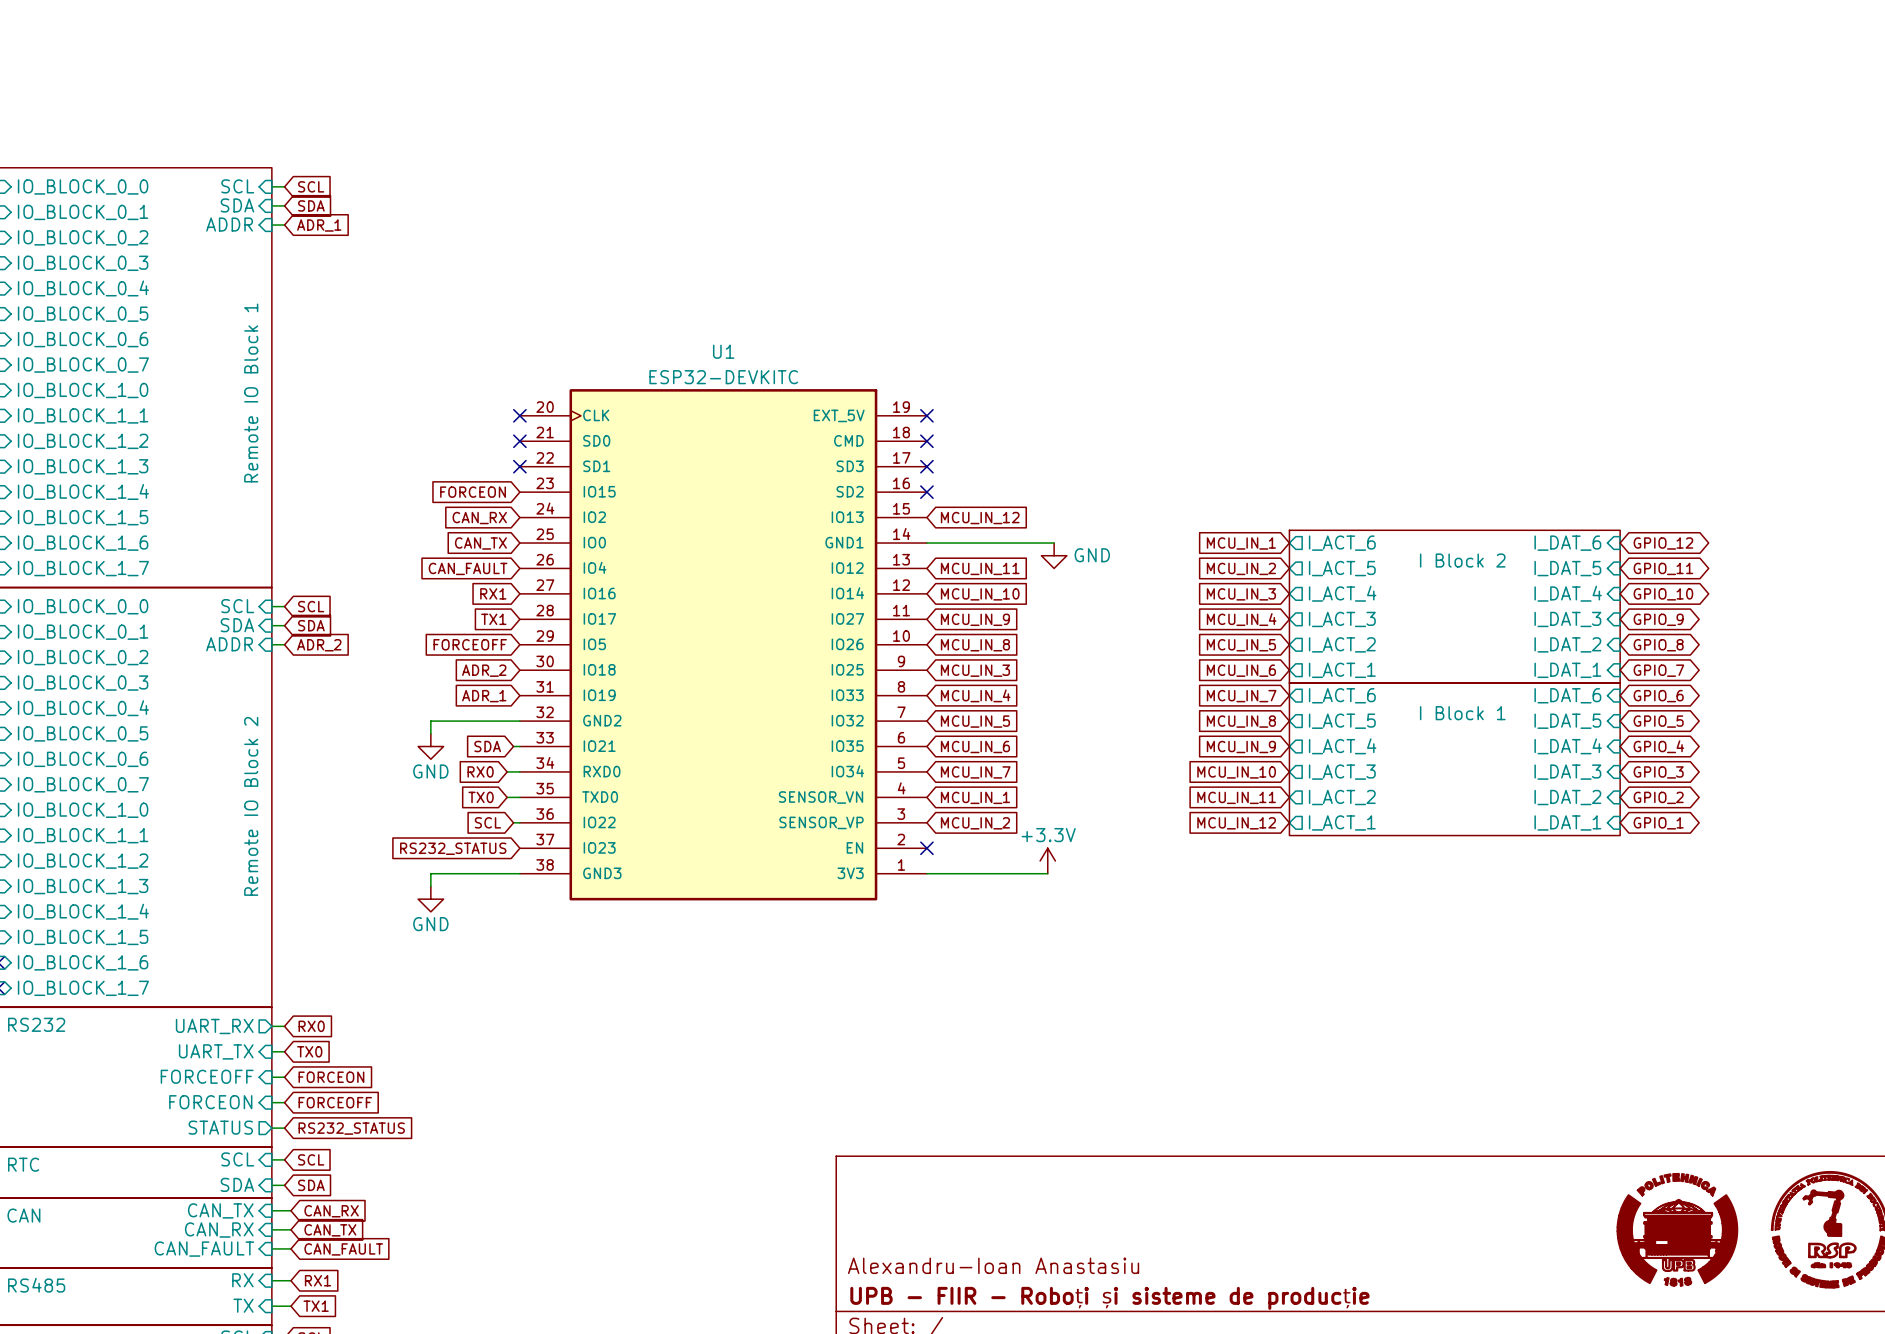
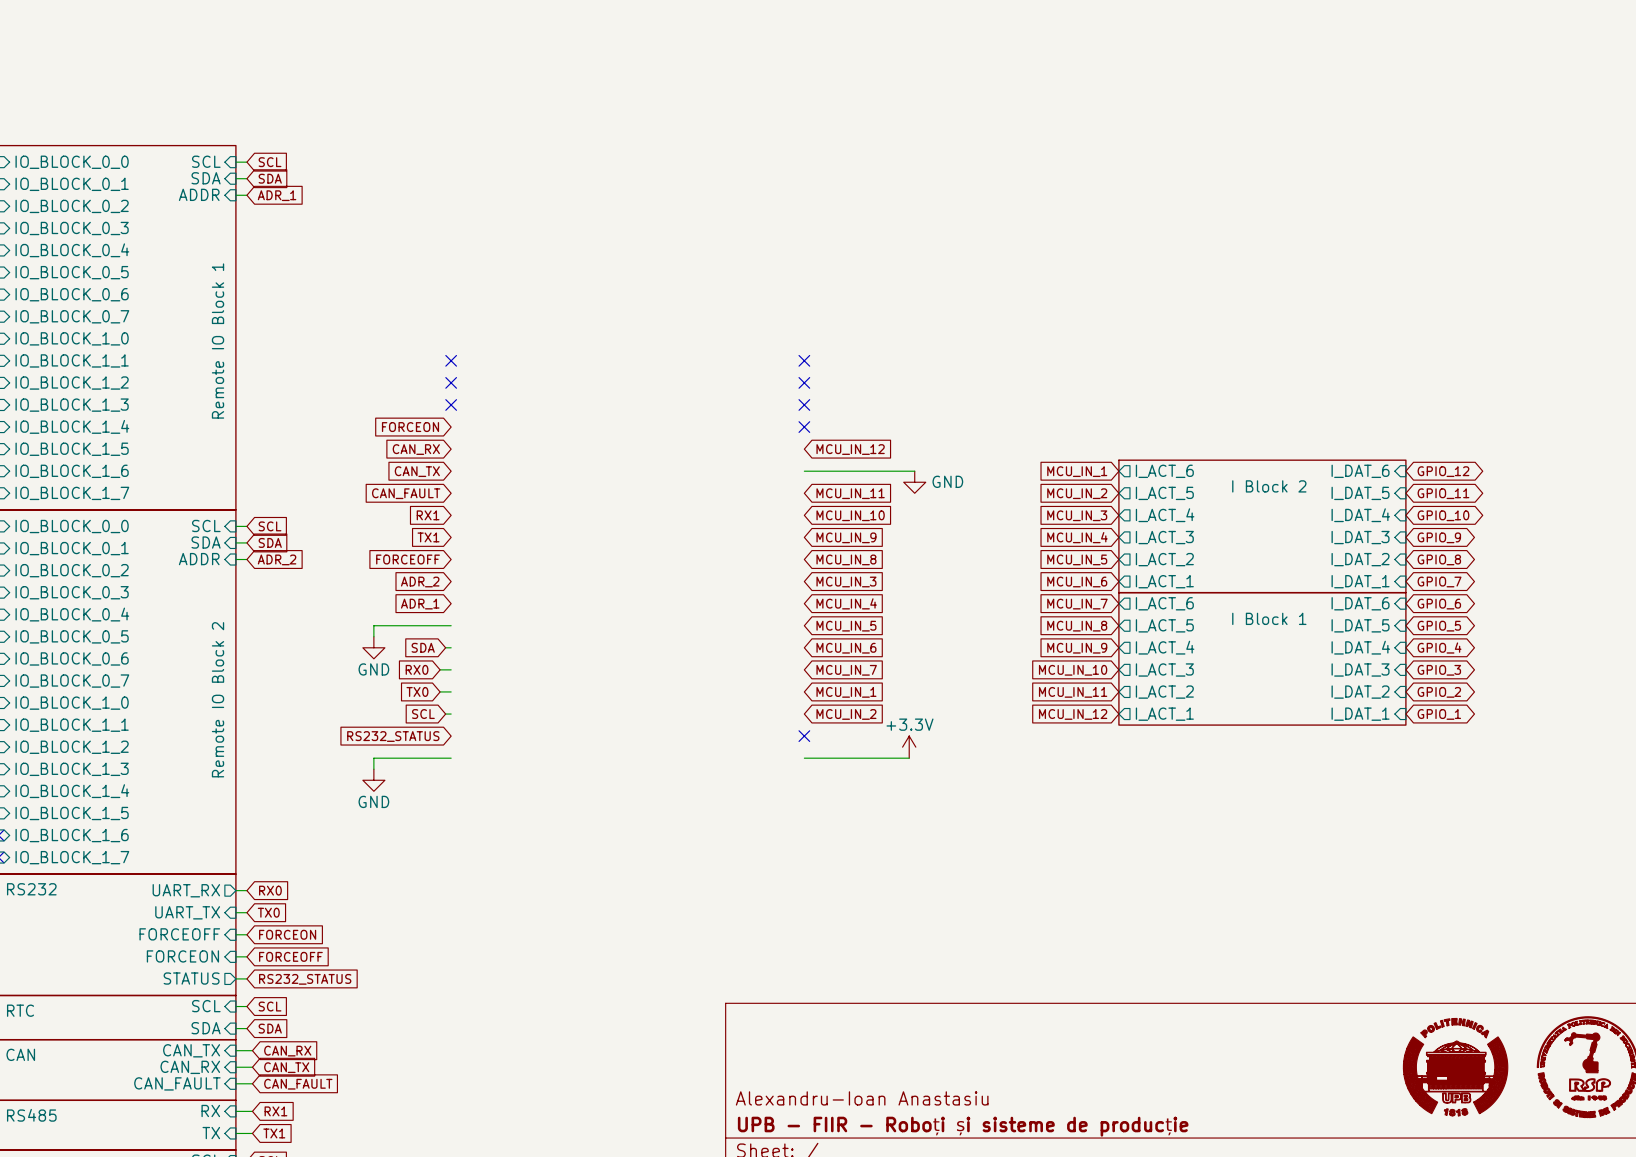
U1: ESP32-DEVKITC (723, 644) -> none

